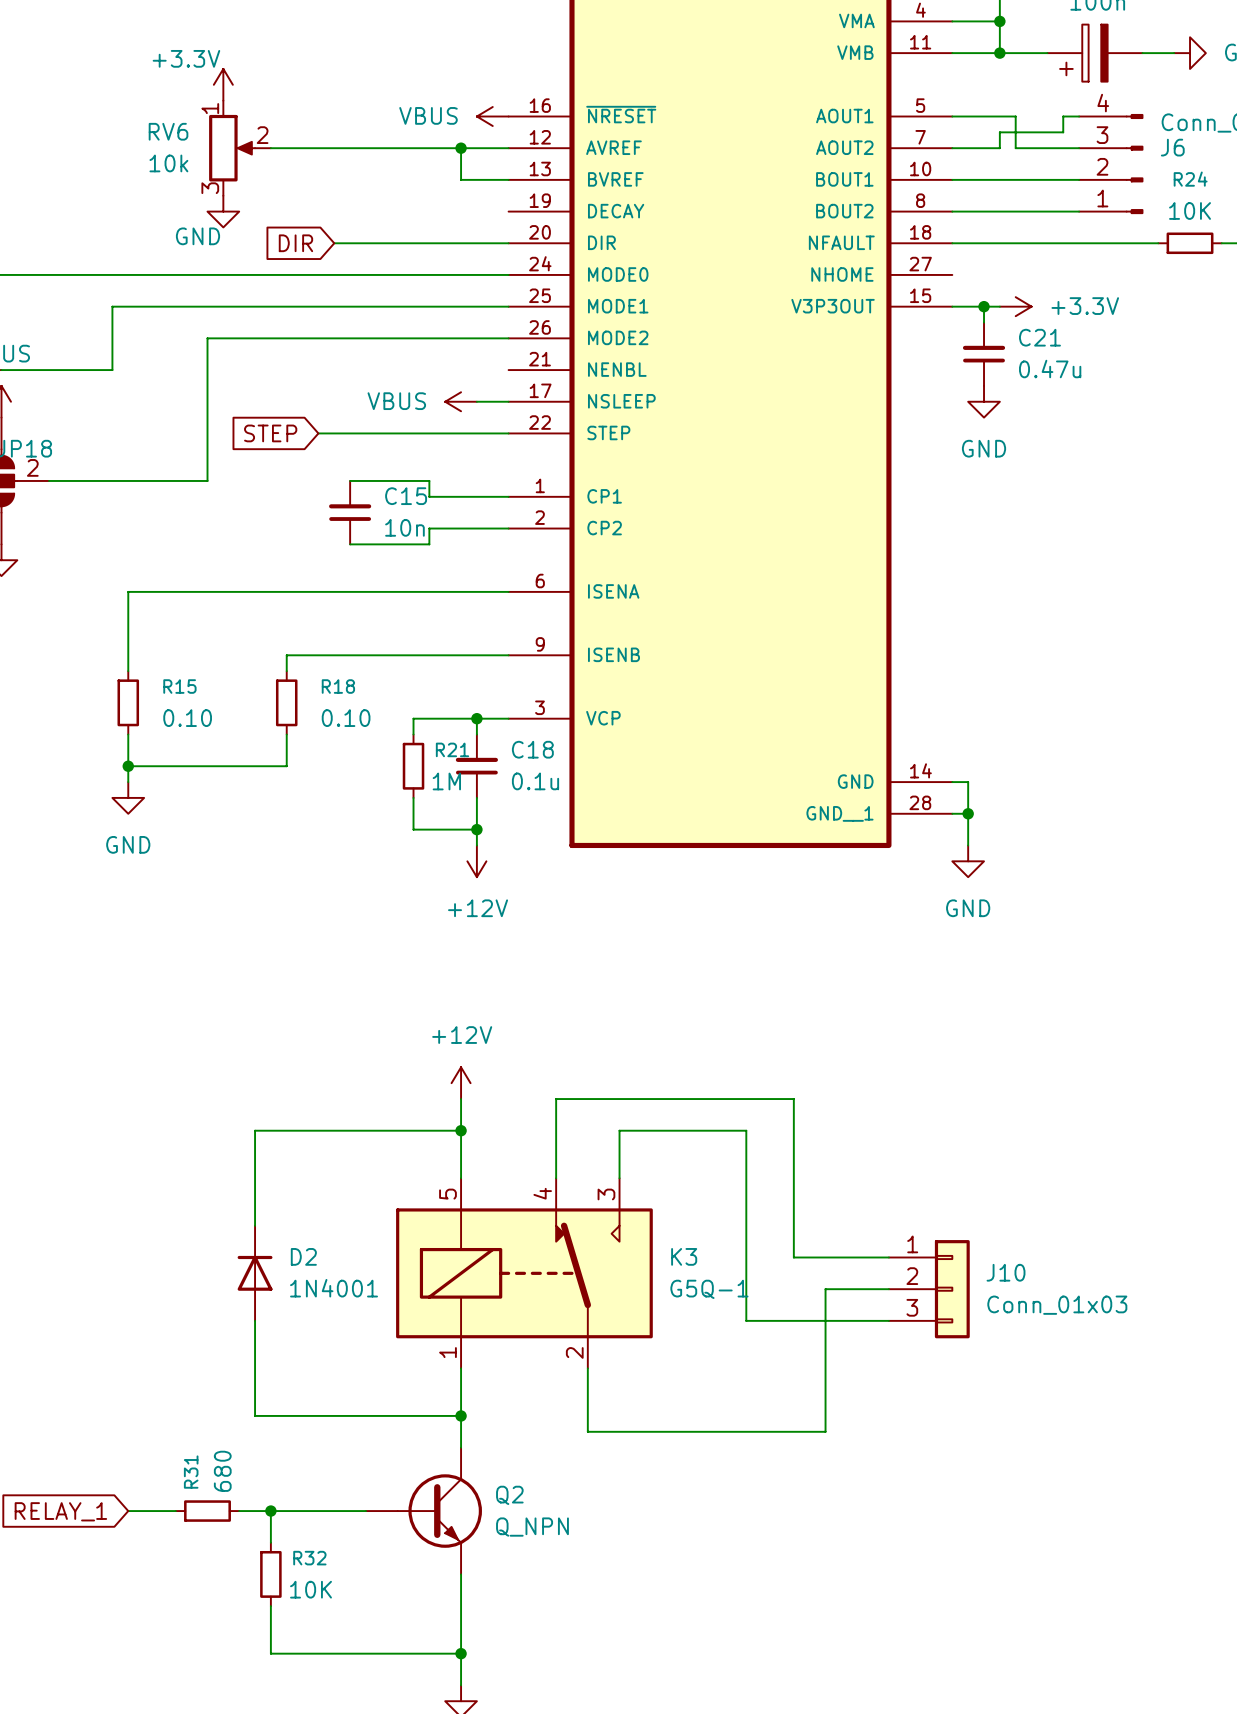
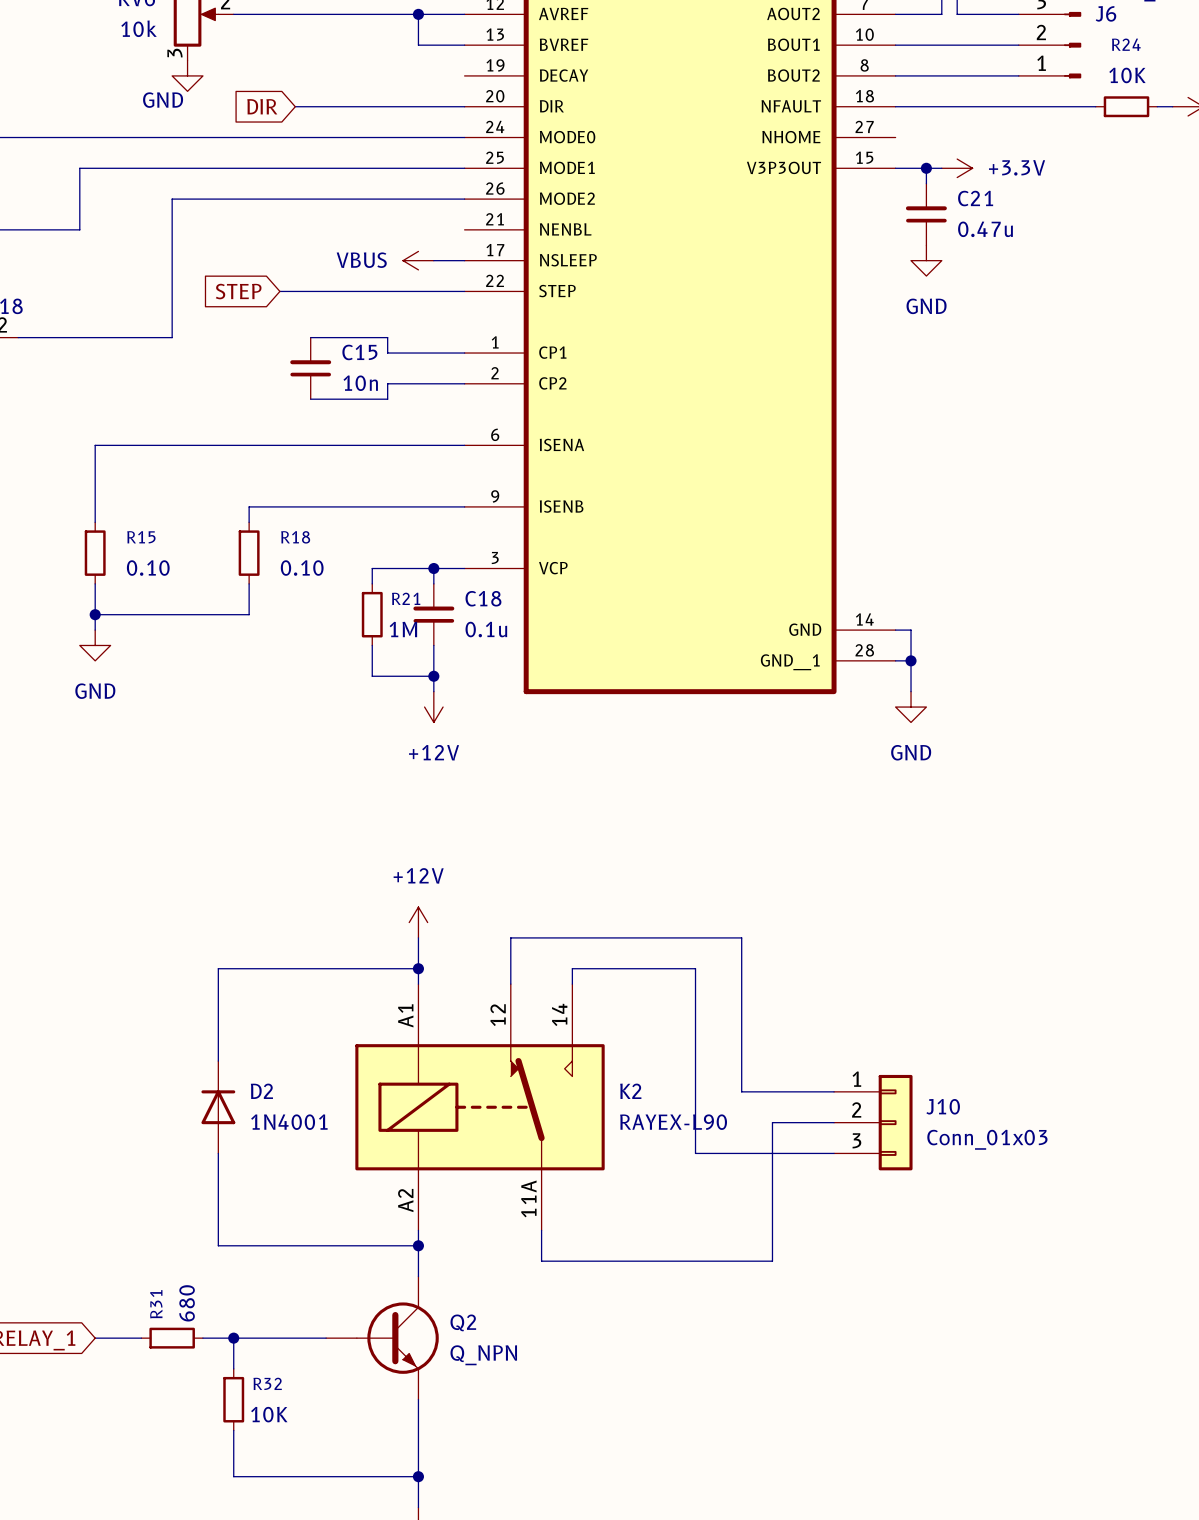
K3: G5Q-1 (524, 1273) -> none
K2: none -> RAYEX-L90 (480, 1107)

